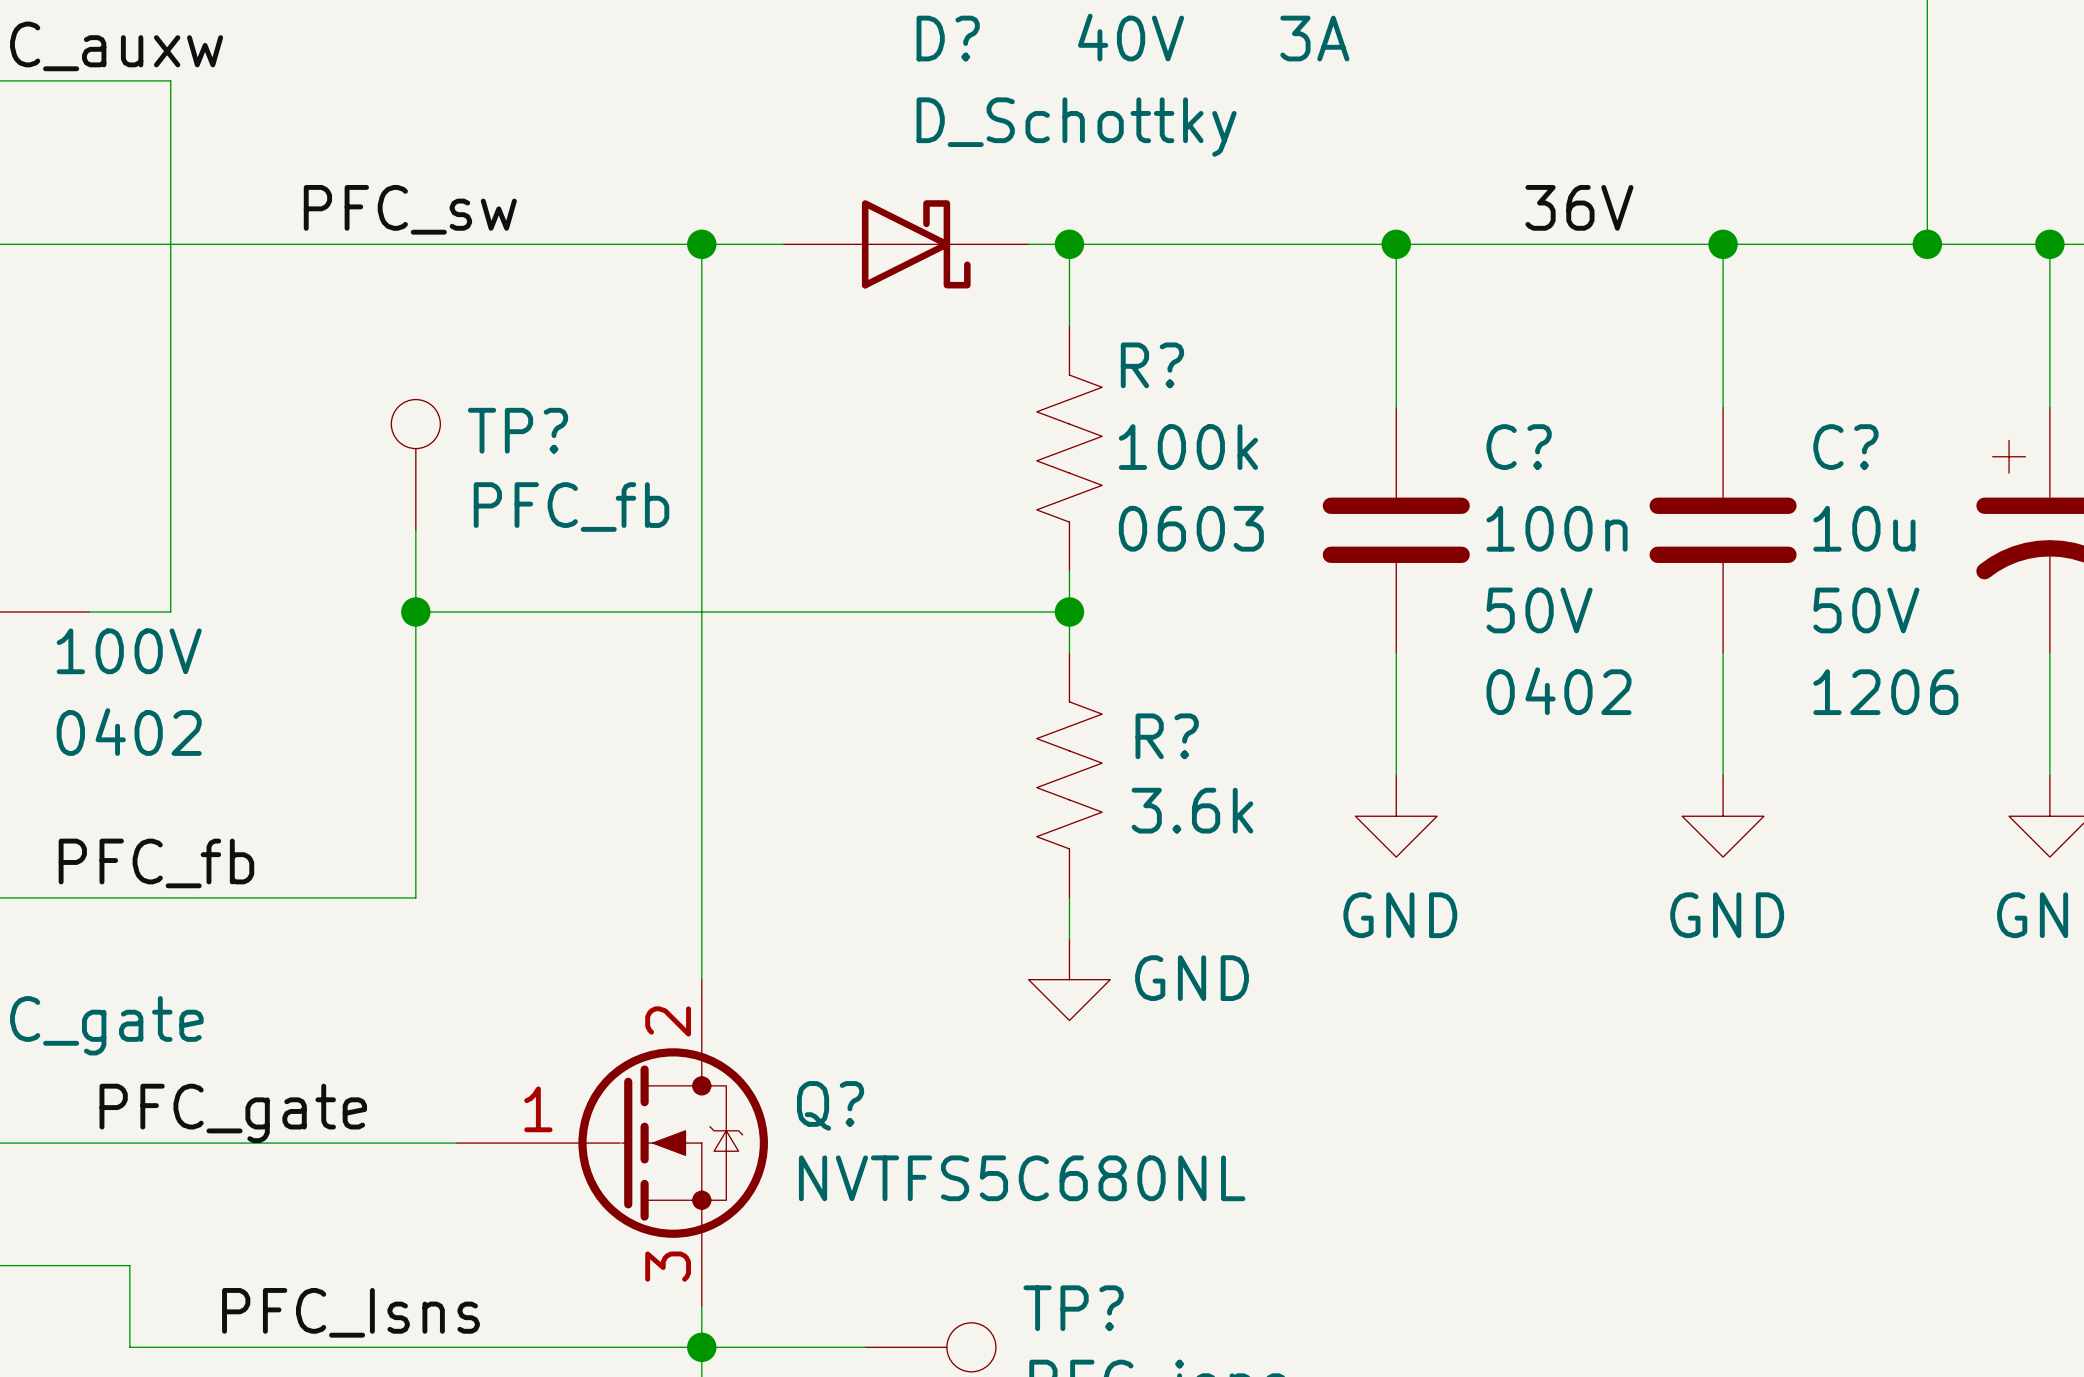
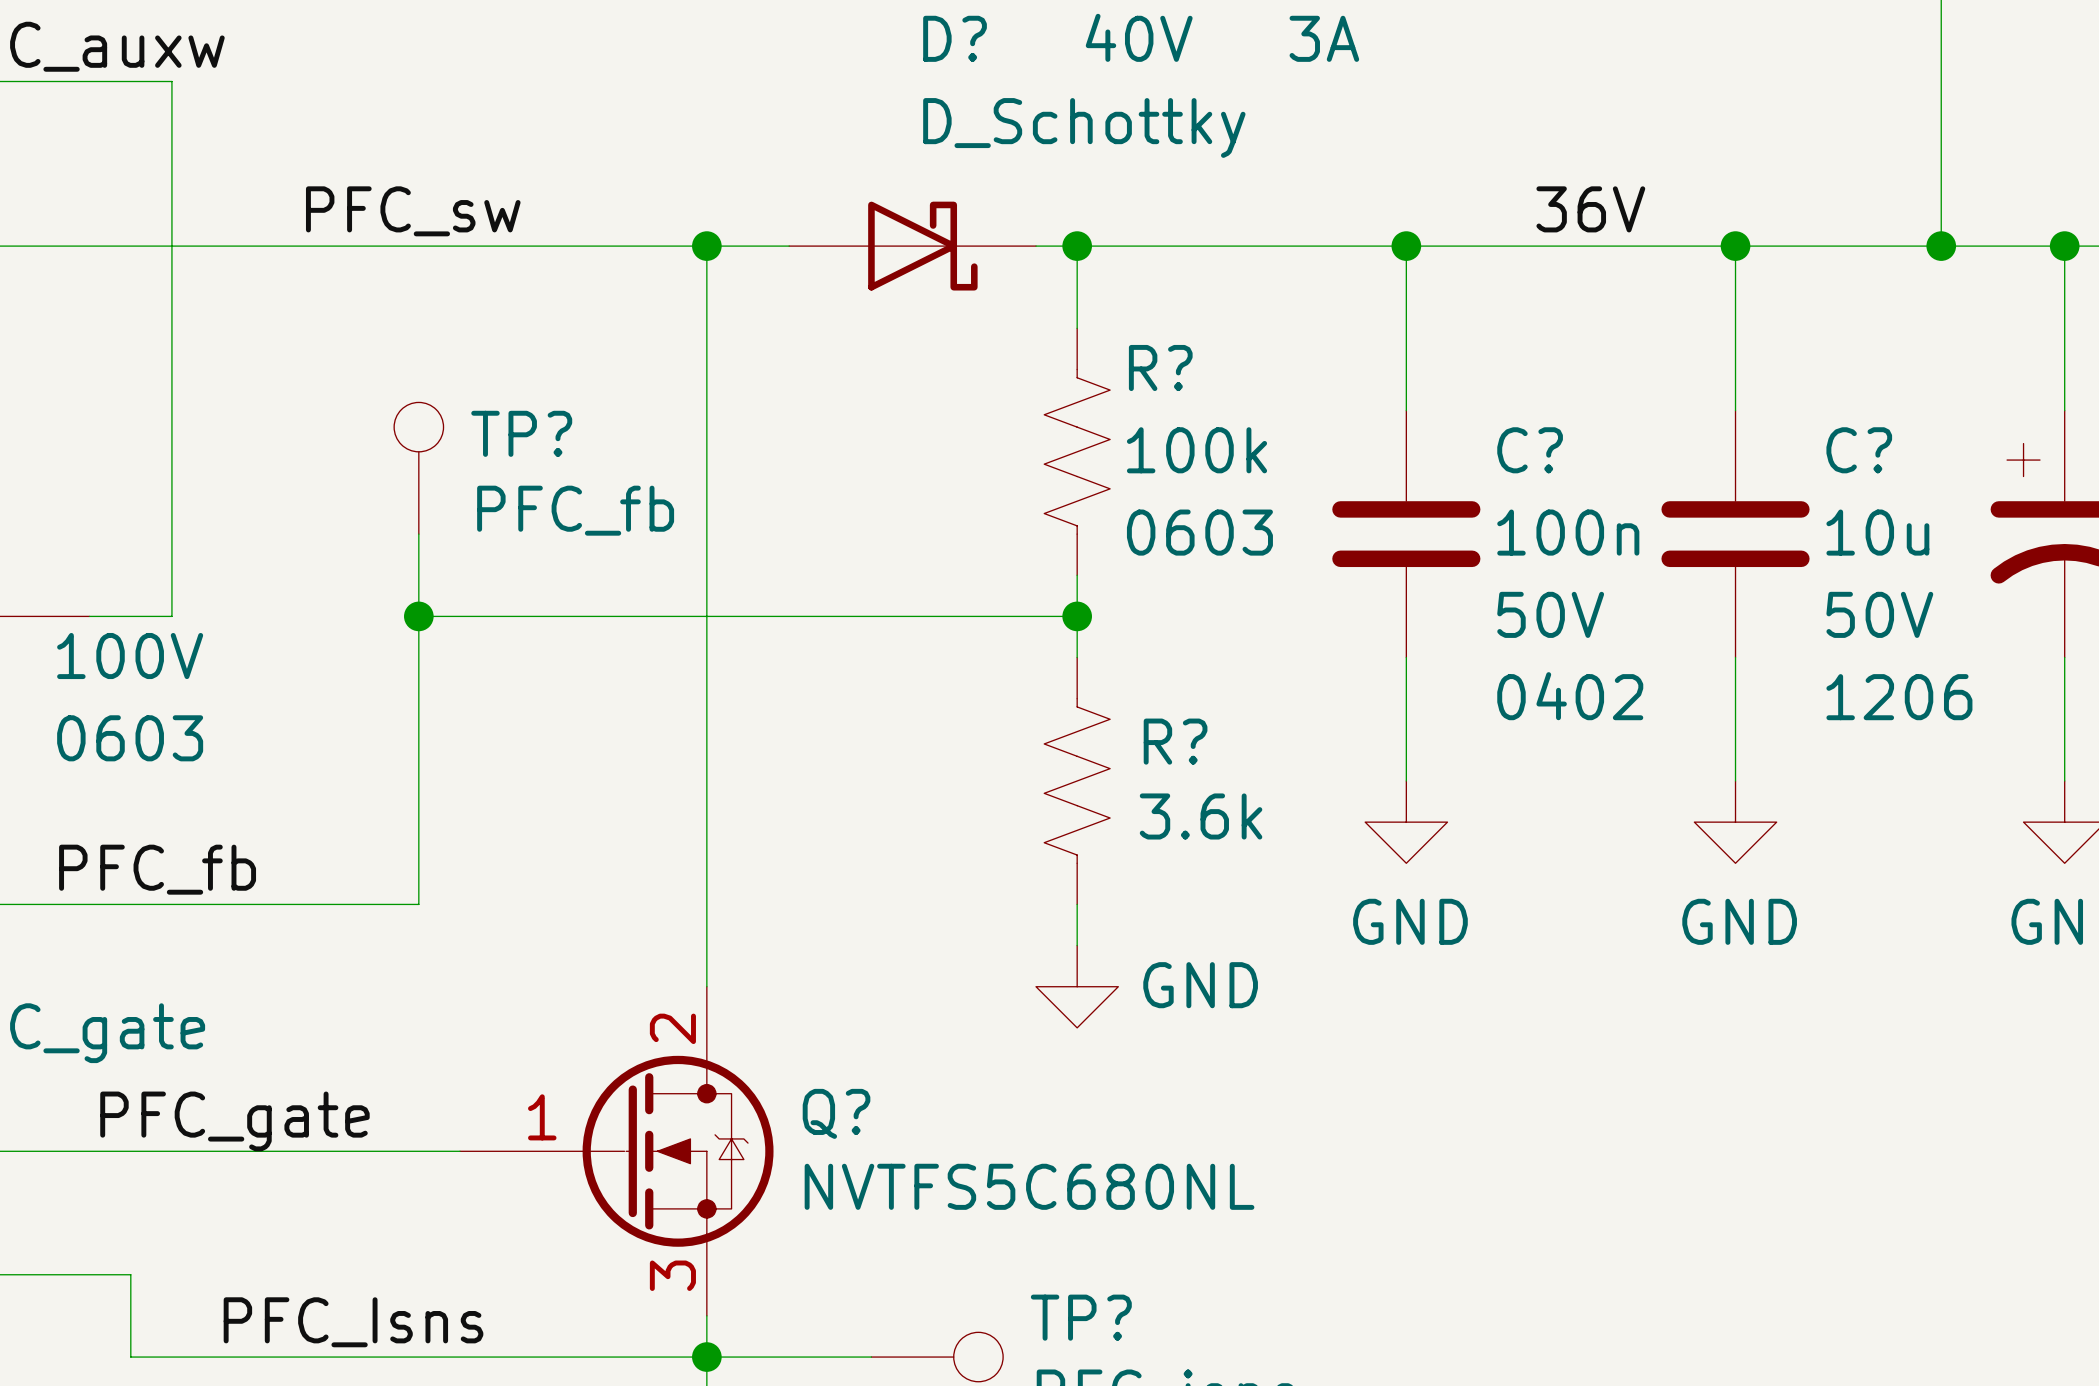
part text: 0402 (129, 732) -> 0603 (130, 738)

